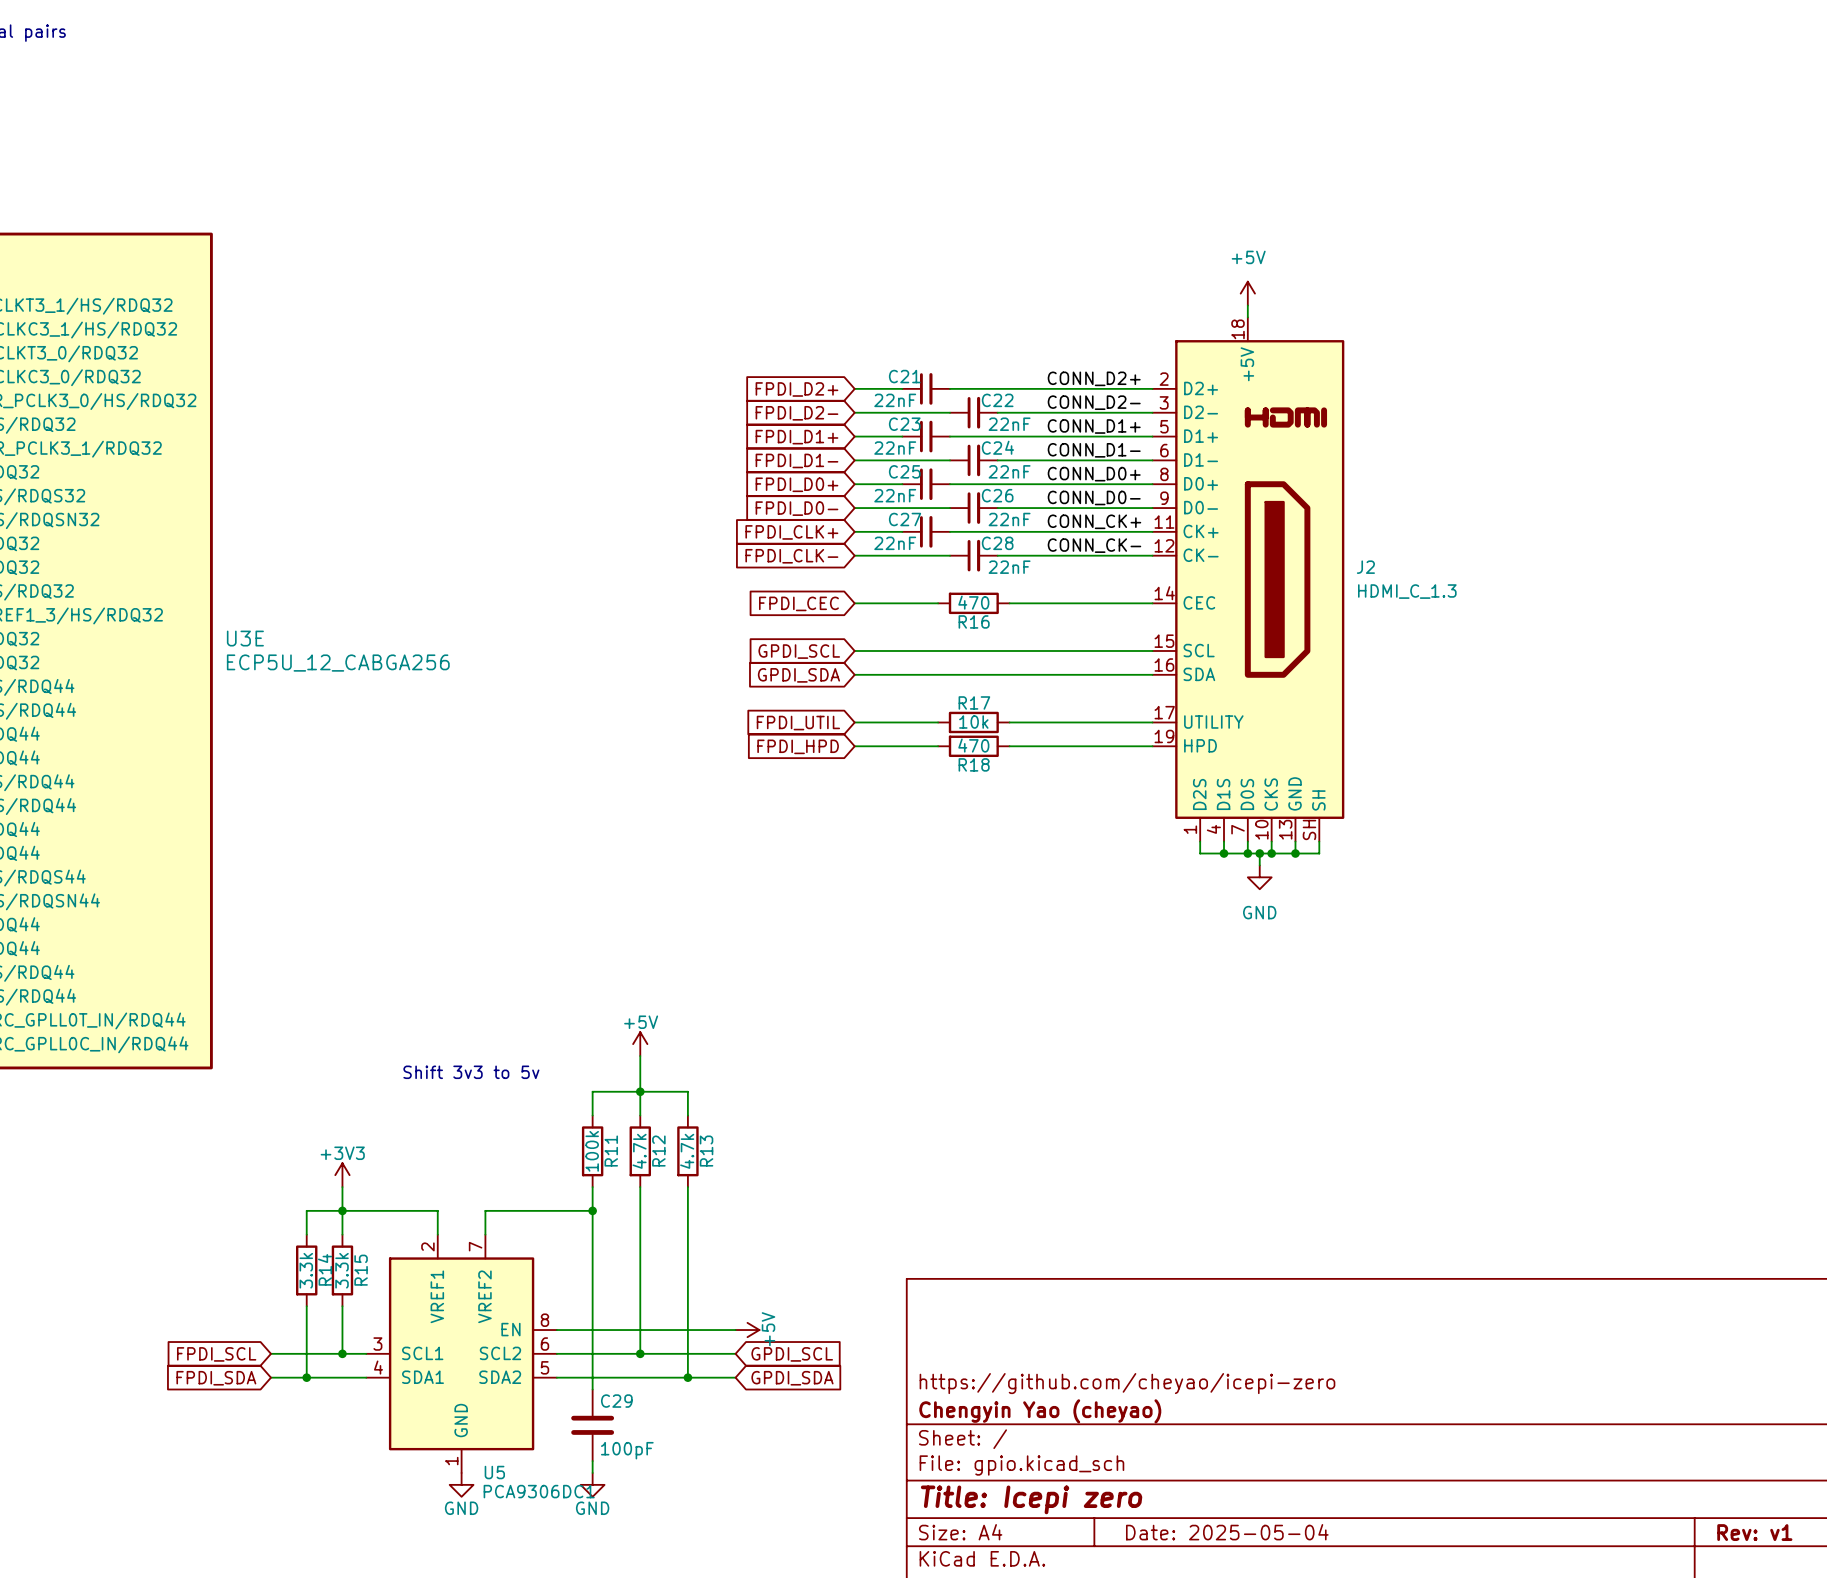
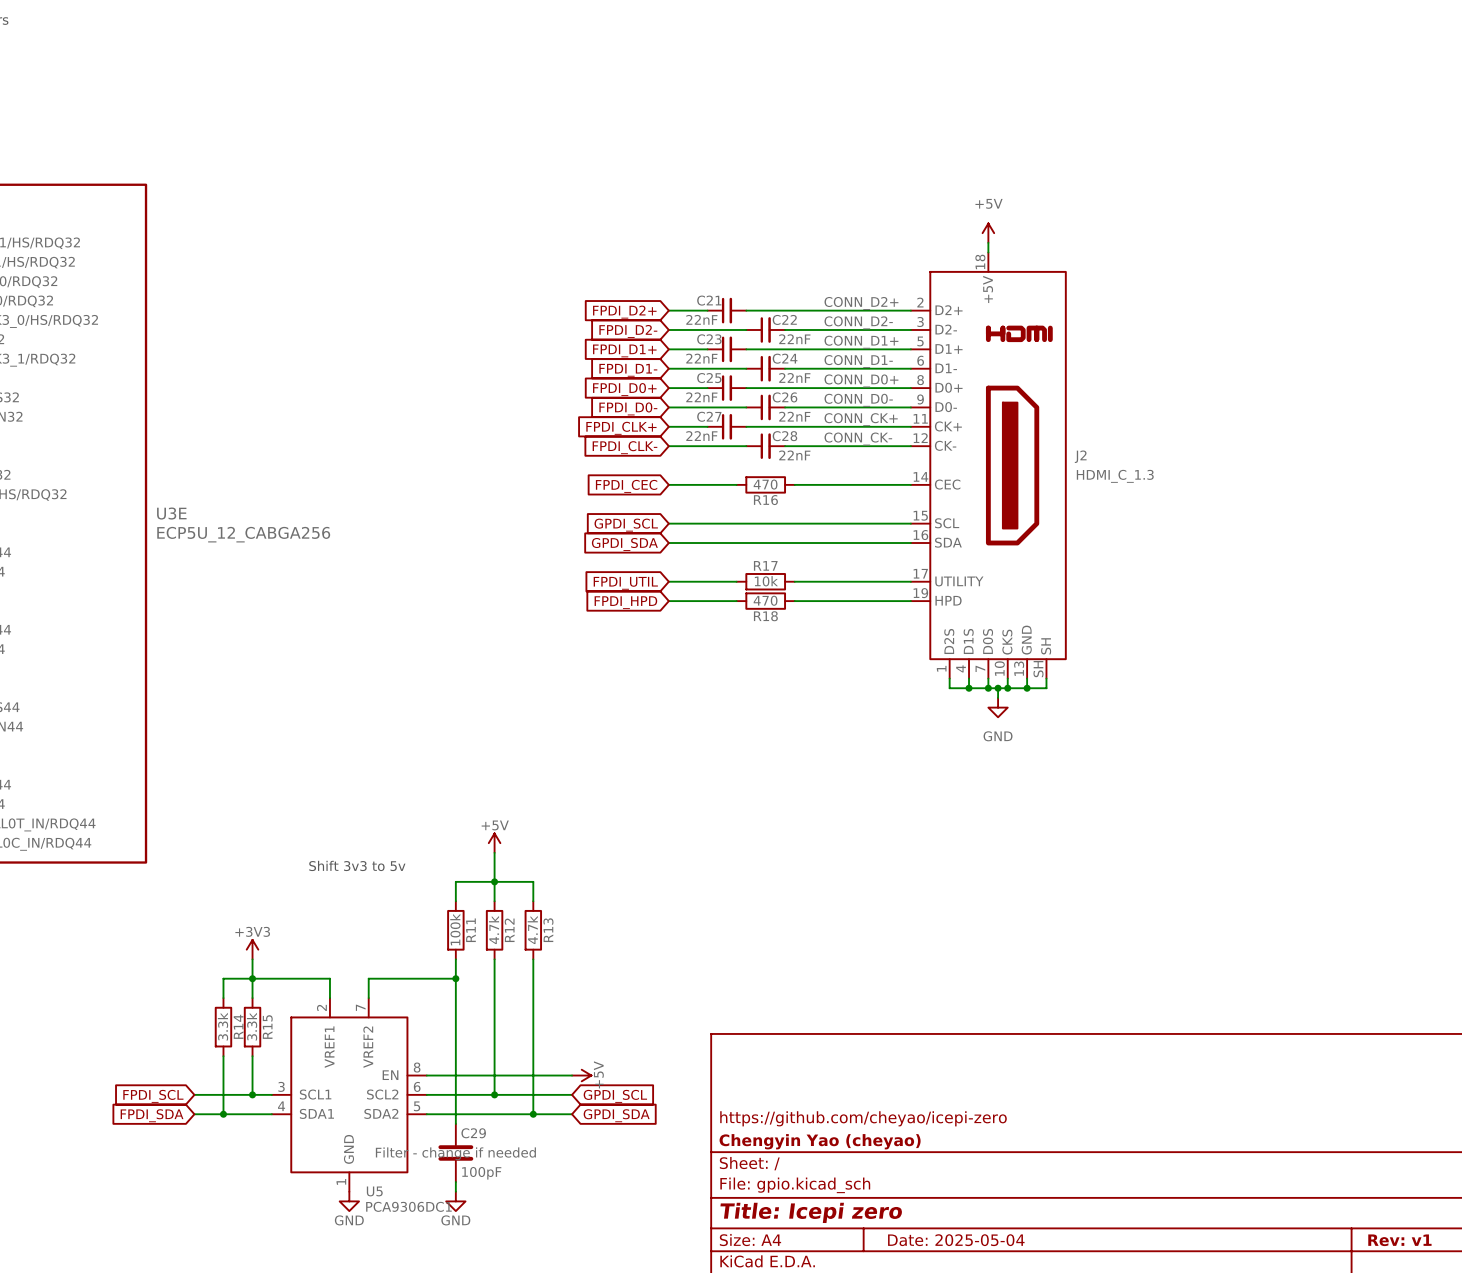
C29 text: none -> Filter - change if needed (455, 1153)

